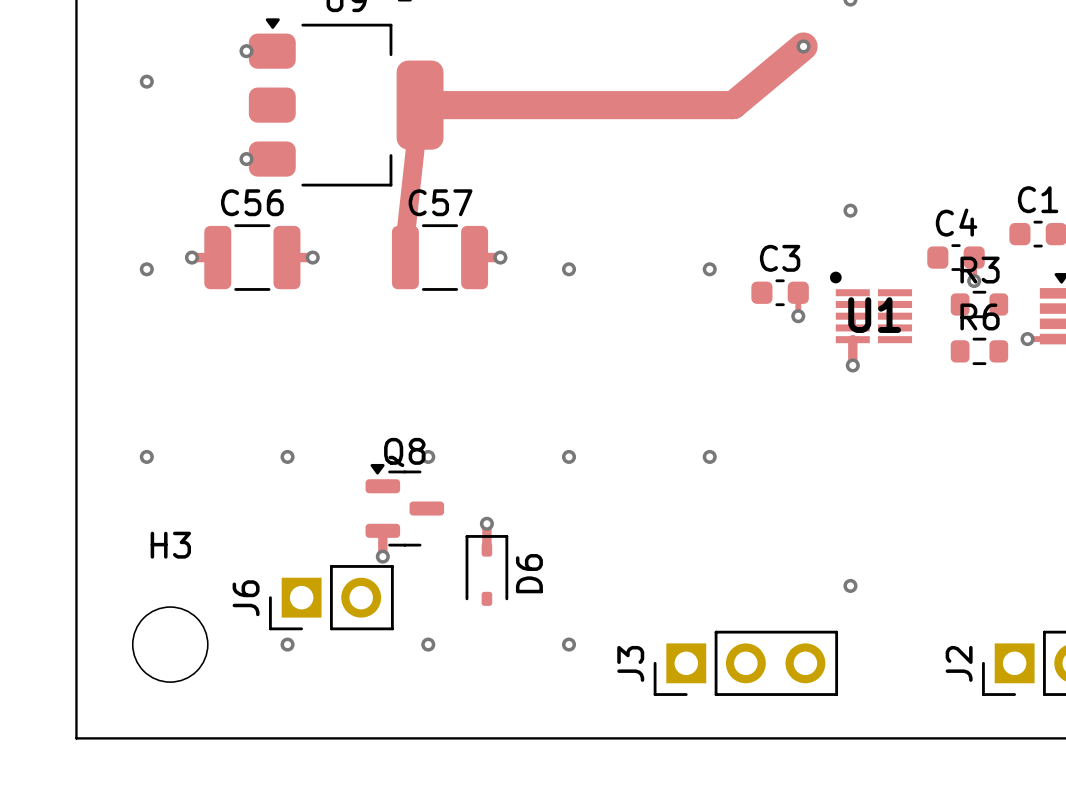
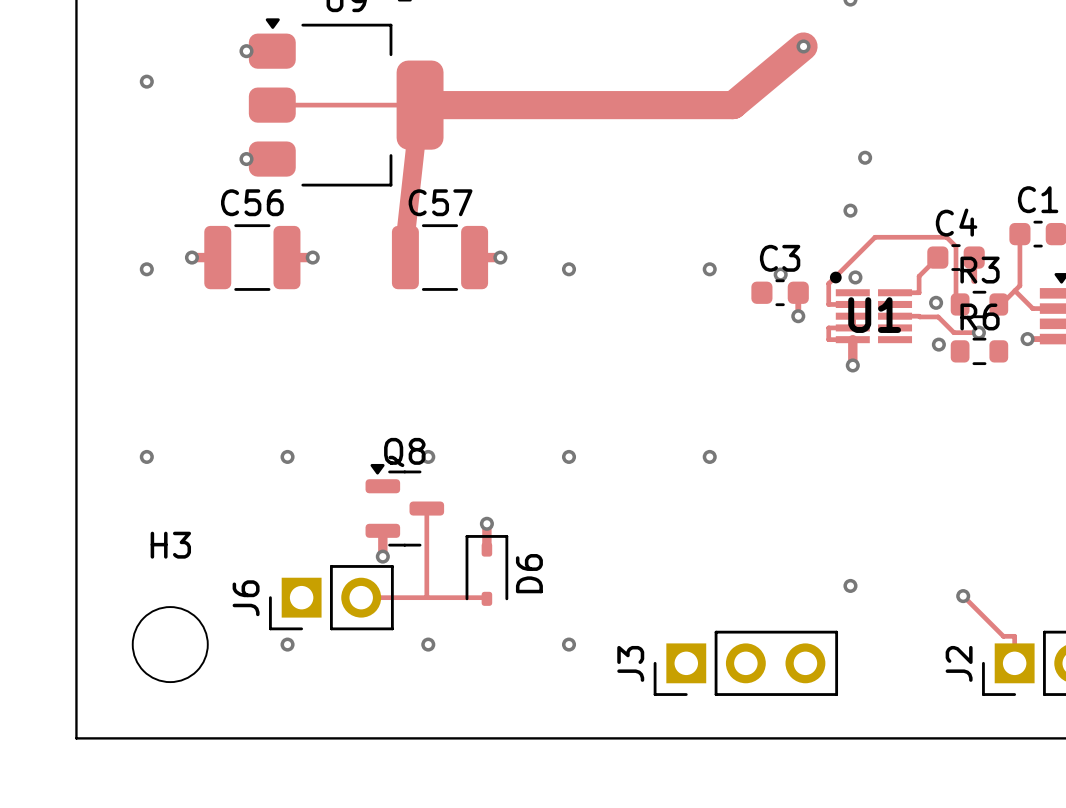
track: none -> (272, 105) (420, 105)
via: none -> (865, 157)
track: none -> (1019, 234) (1019, 285) (1001, 304) (998, 304)
track: none -> (937, 257) (919, 276) (919, 292) (895, 292)
via: none -> (780, 274)
via: none -> (855, 277)
via: (974, 281) -> none
track: none -> (1014, 290) (1032, 308) (1056, 308)
via: none -> (936, 302)
track: none -> (852, 304) (828, 304) (828, 283) (875, 237) (946, 237) (956, 246) (956, 300) (960, 304)
track: none -> (895, 316) (938, 316) (953, 332) (978, 332)
track: none -> (852, 327) (828, 327) (828, 339) (852, 339)
via: none -> (978, 332)
via: none -> (938, 344)
track: none -> (426, 508) (426, 597)
track: none -> (963, 596) (1003, 636) (1014, 636) (1014, 663)
via: none -> (963, 596)
track: none -> (361, 597) (486, 598)

